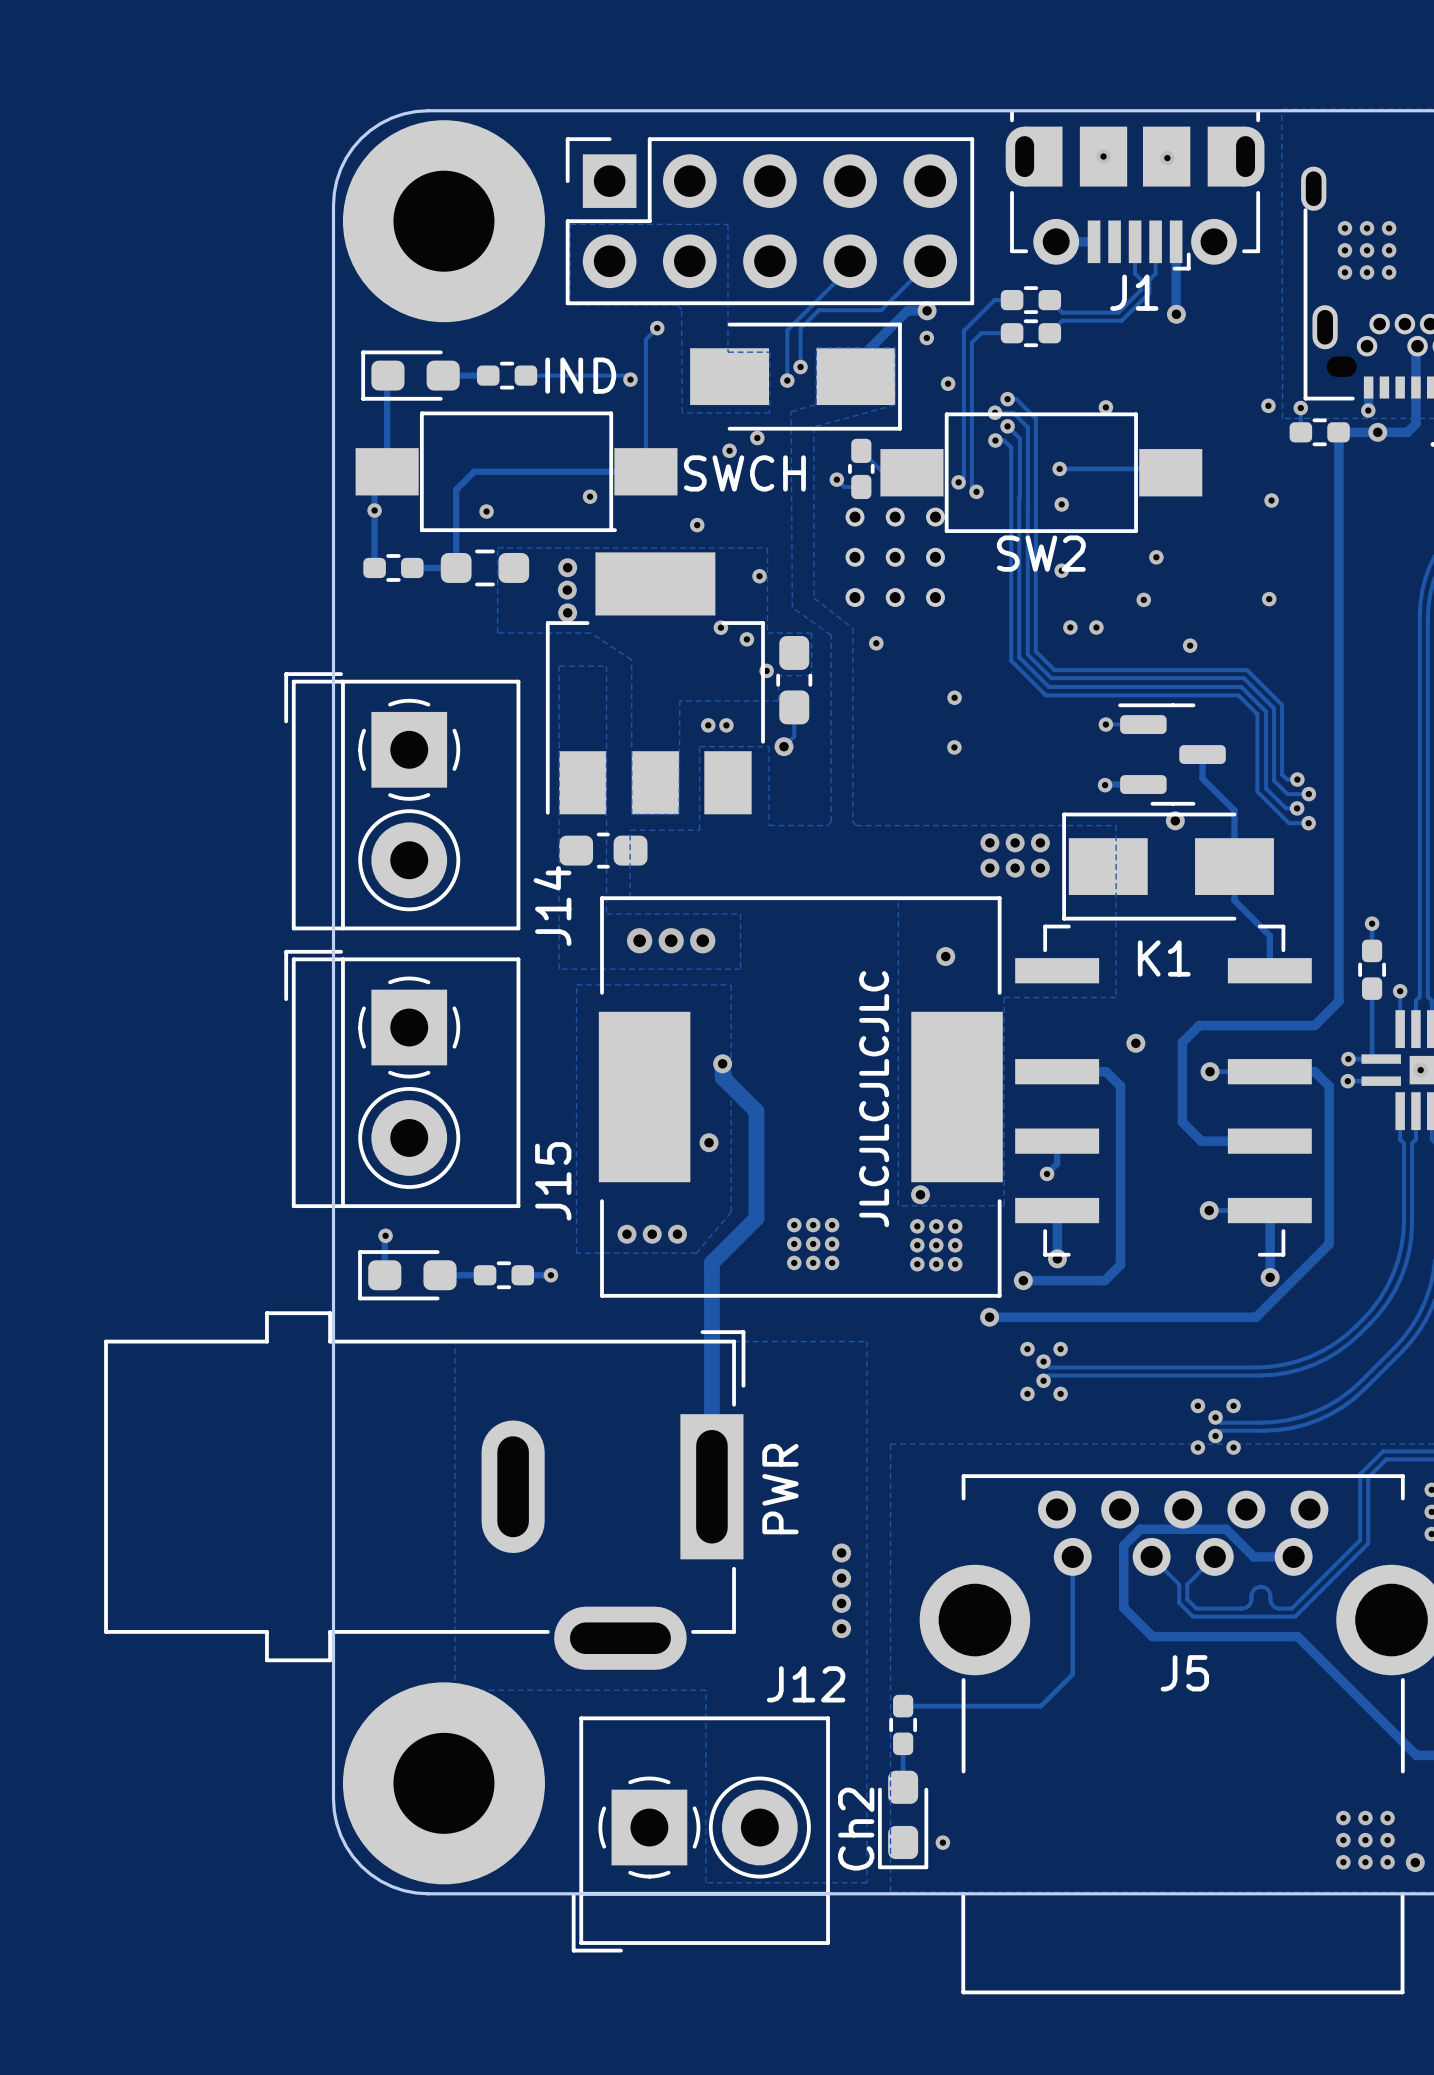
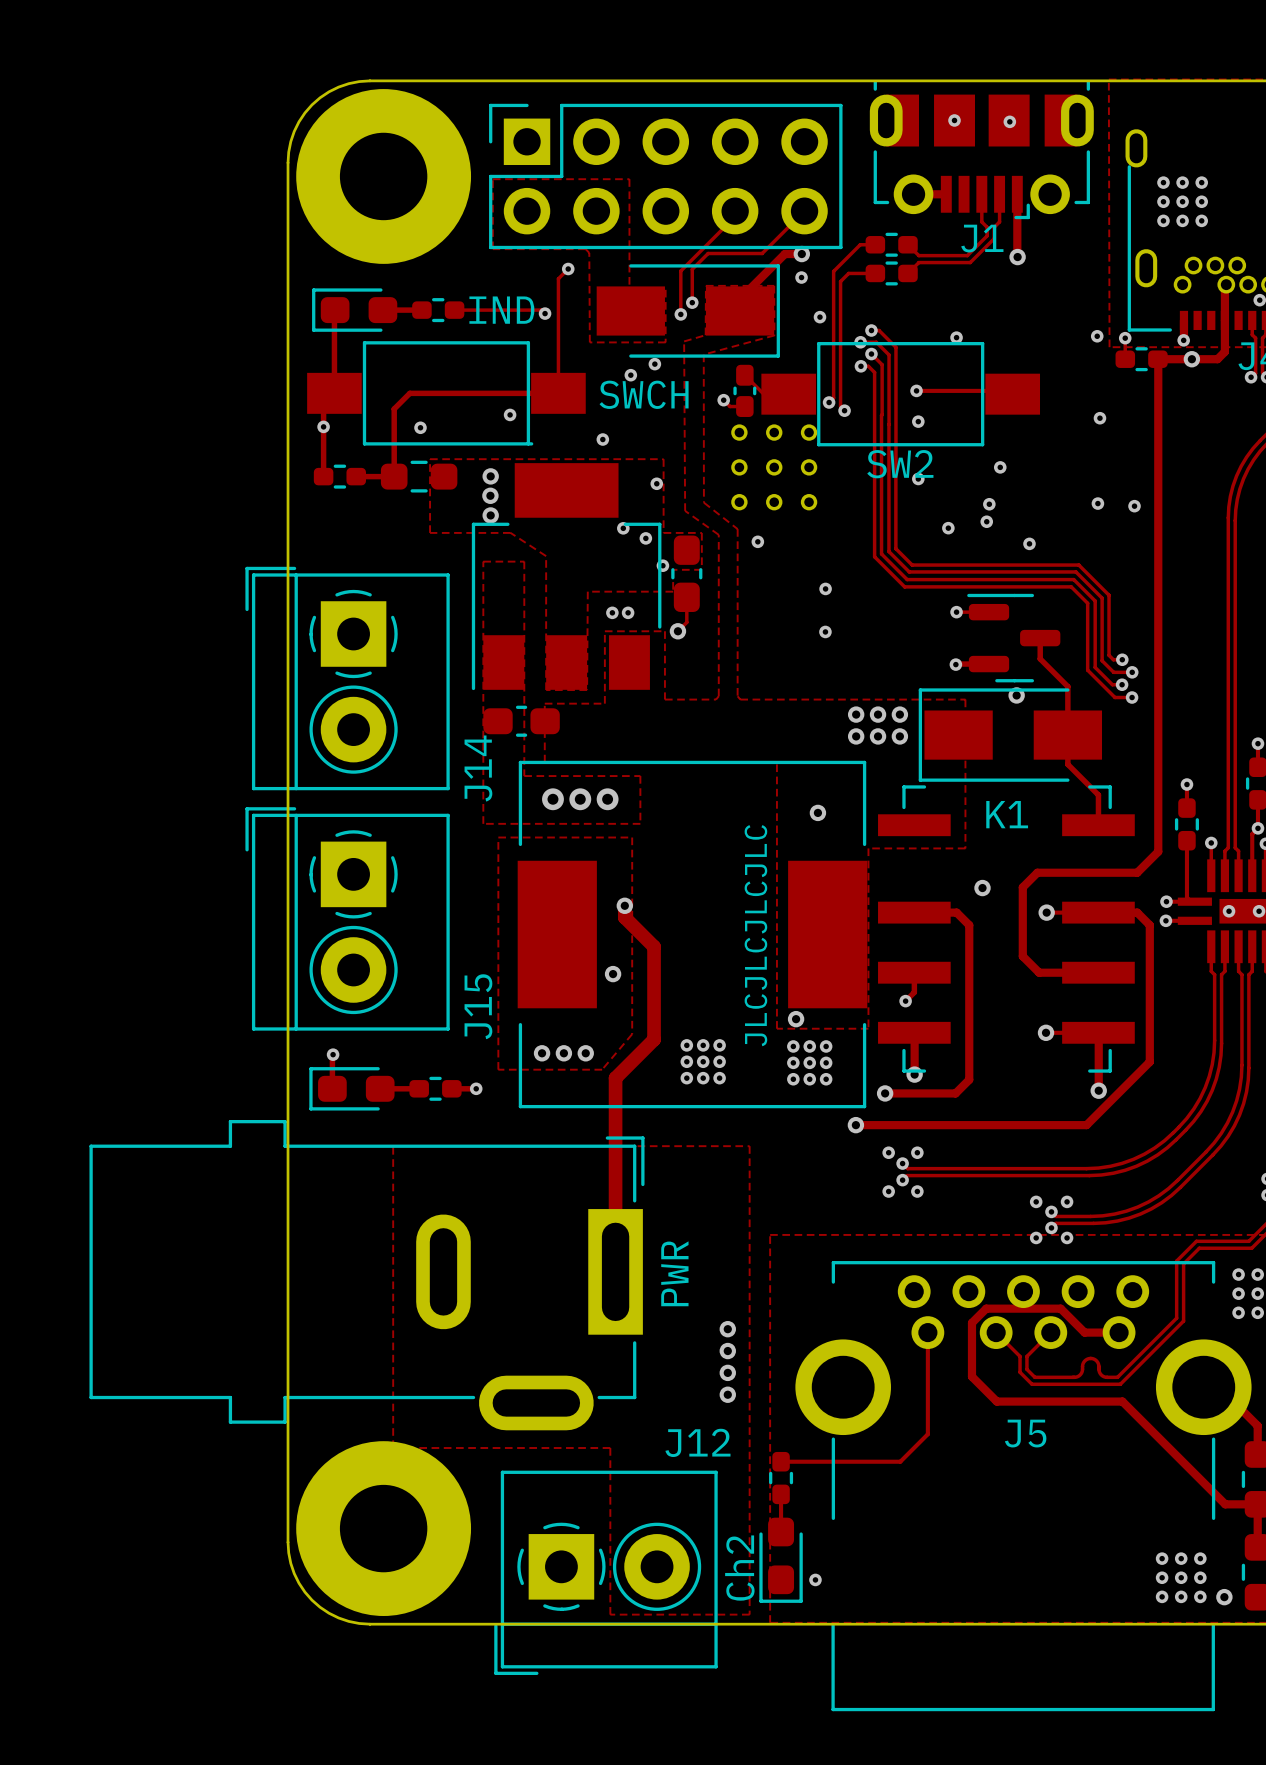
via: none -> (1134, 506)
via position: (1070, 627) -> (986, 521)

